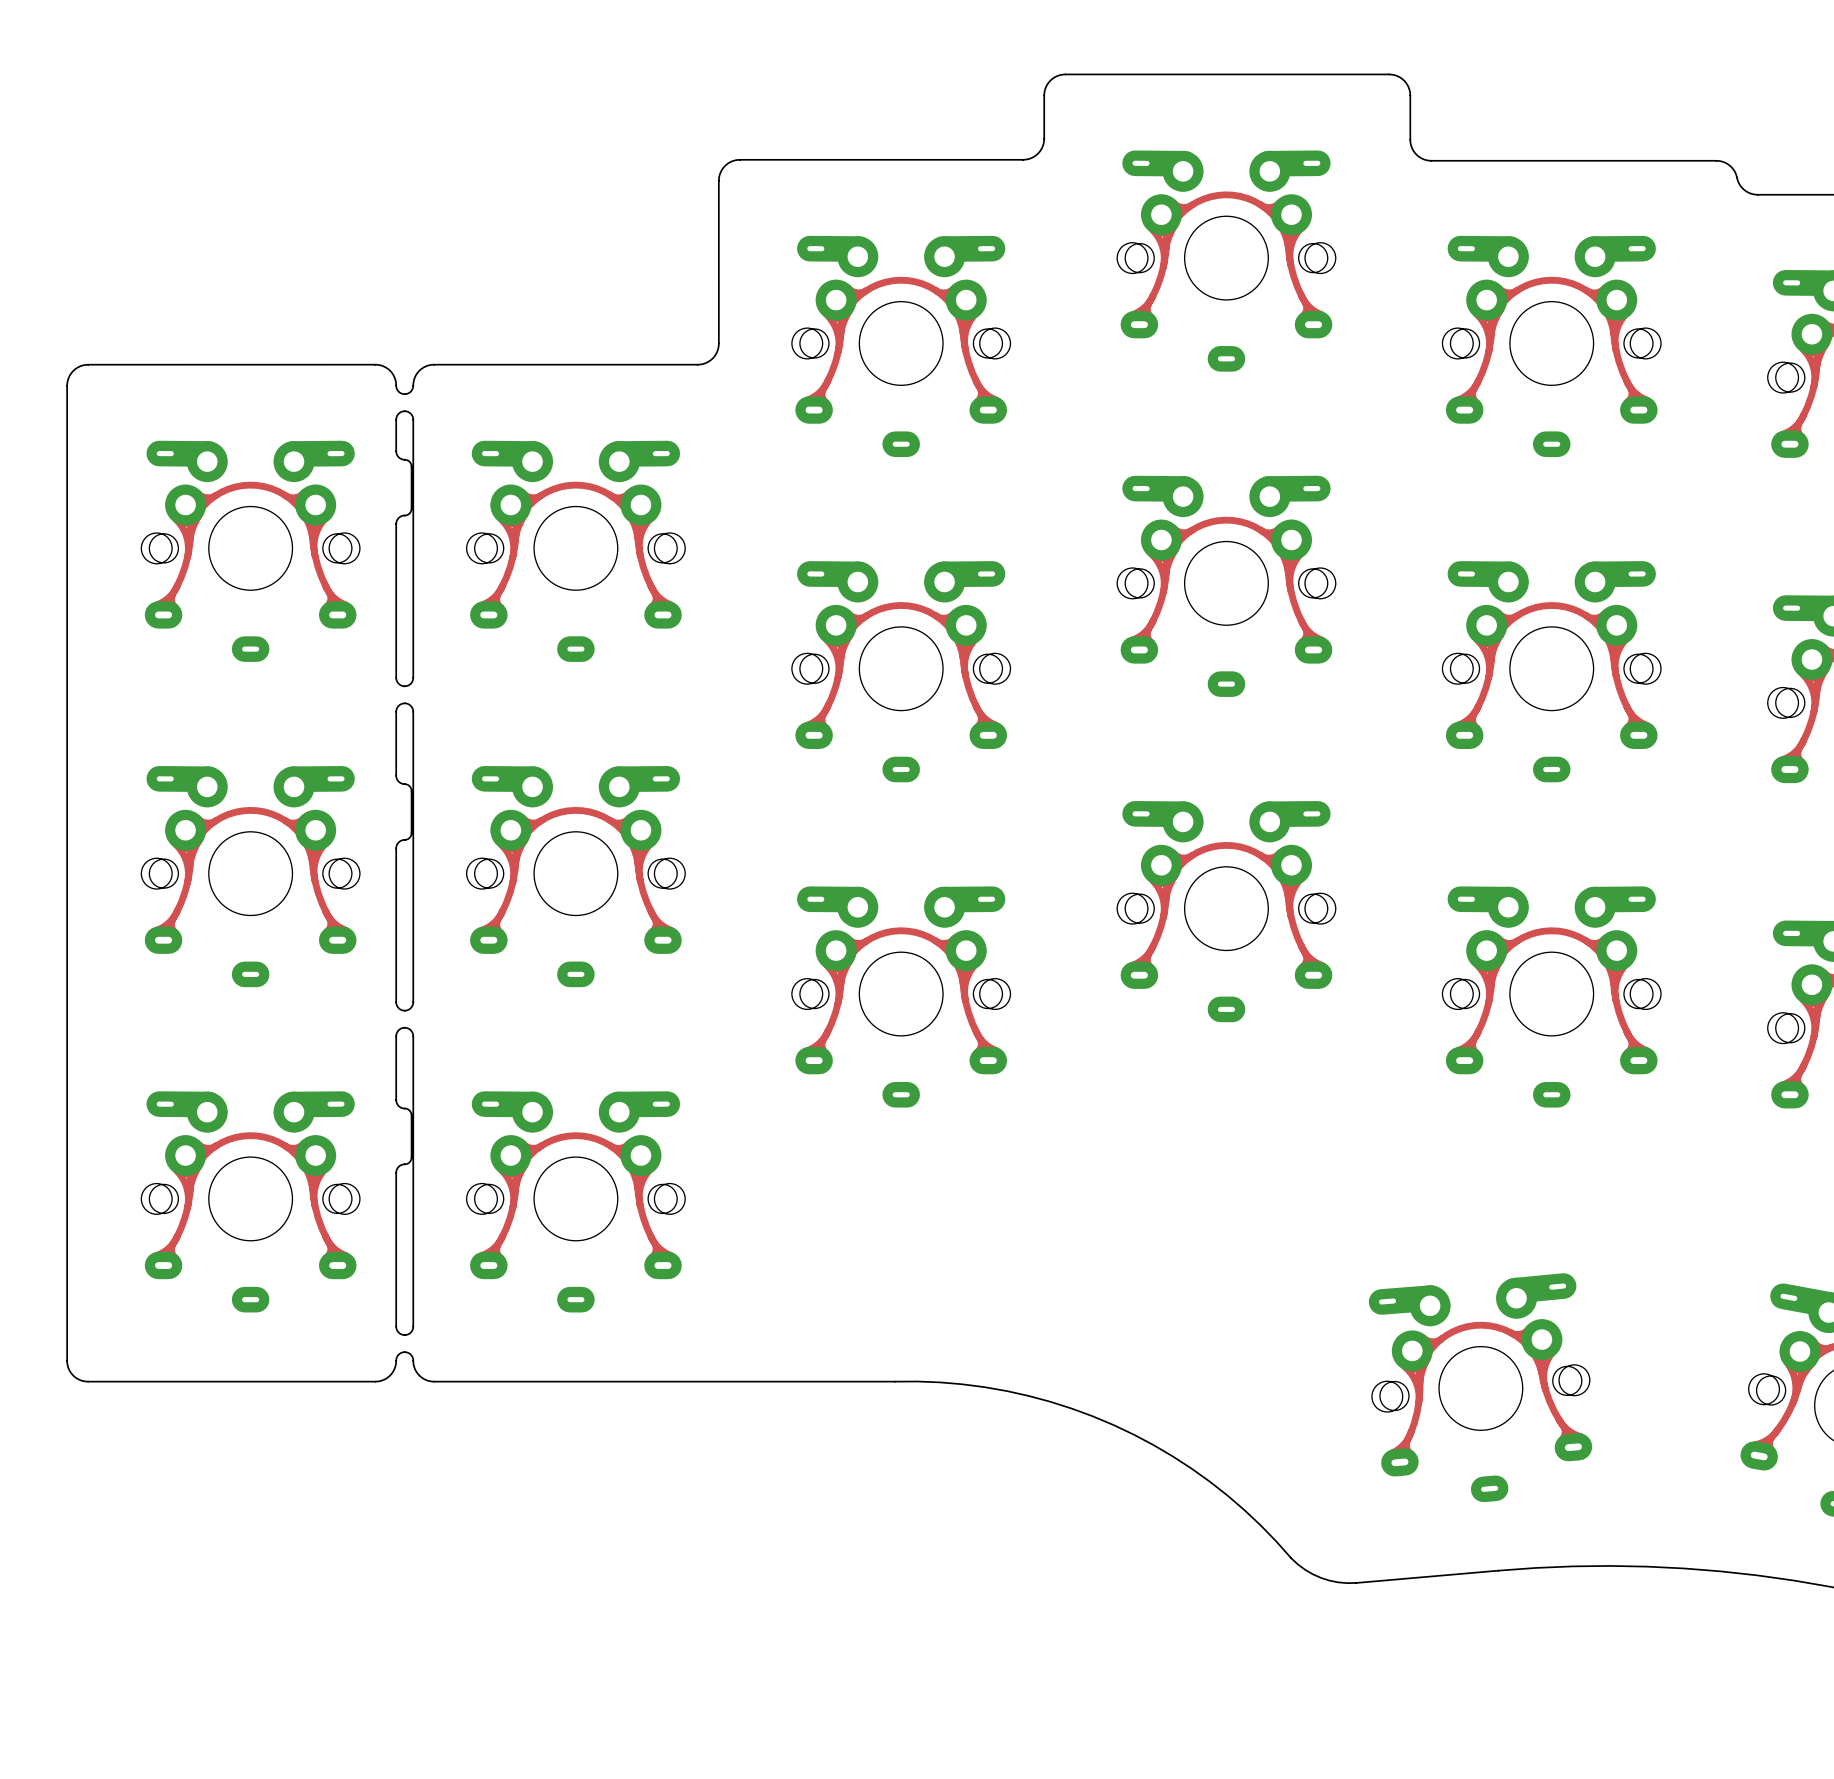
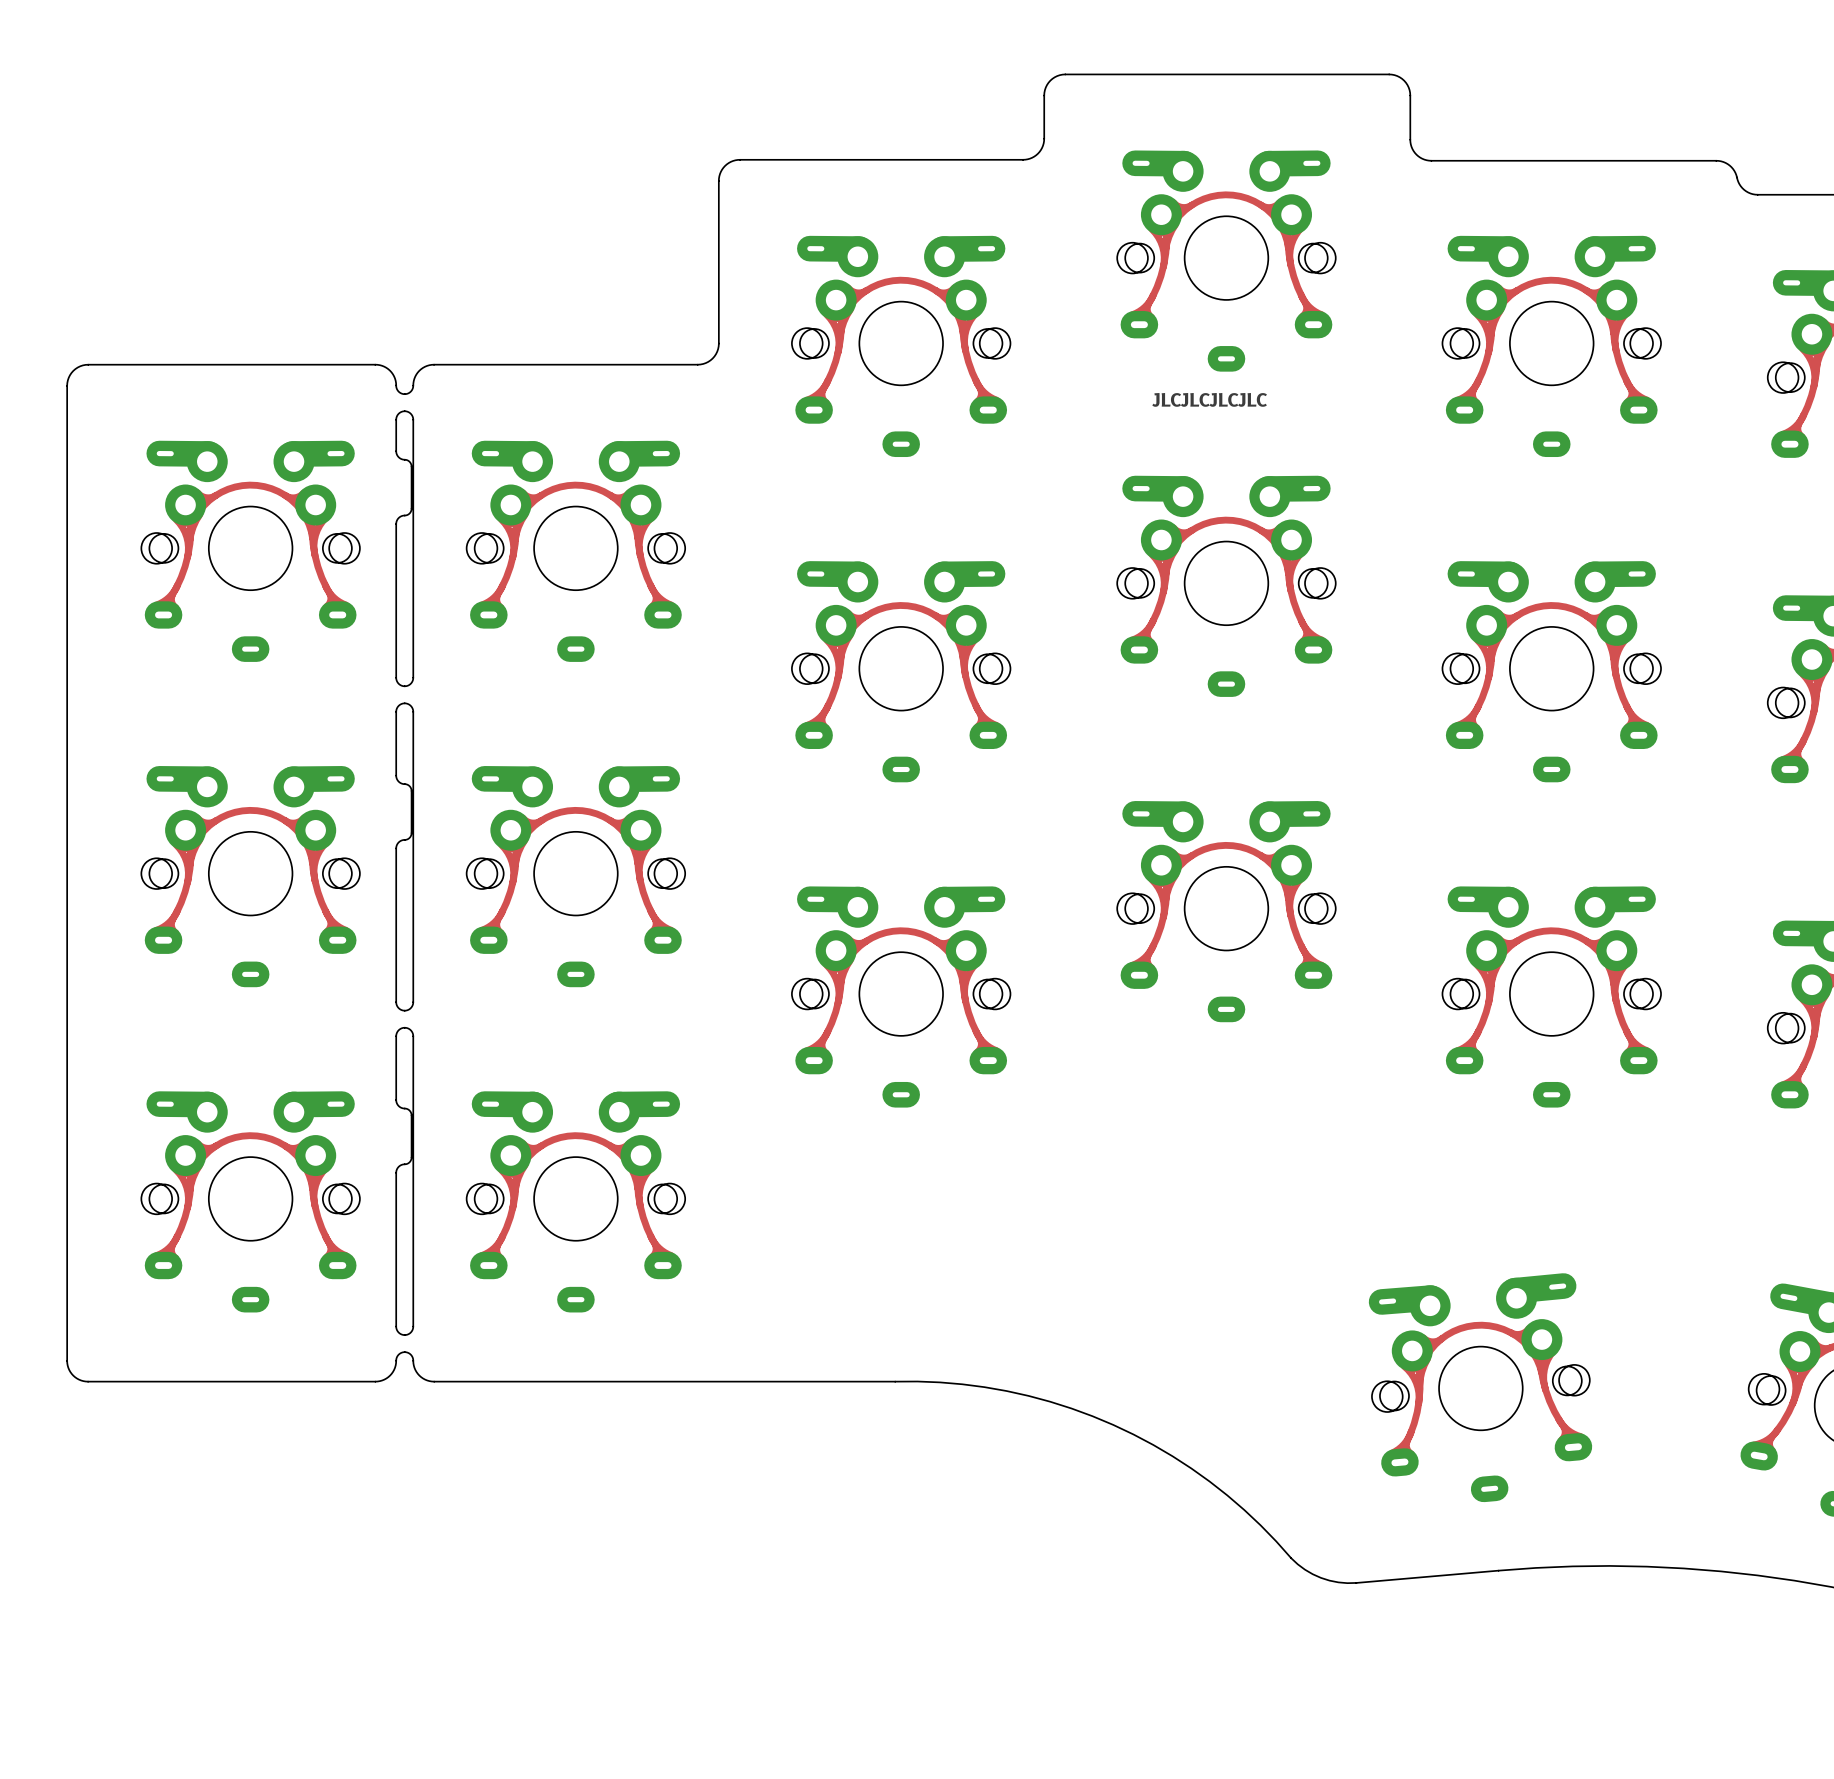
text: none -> JLCJLCJLCJLC (1209, 399)

